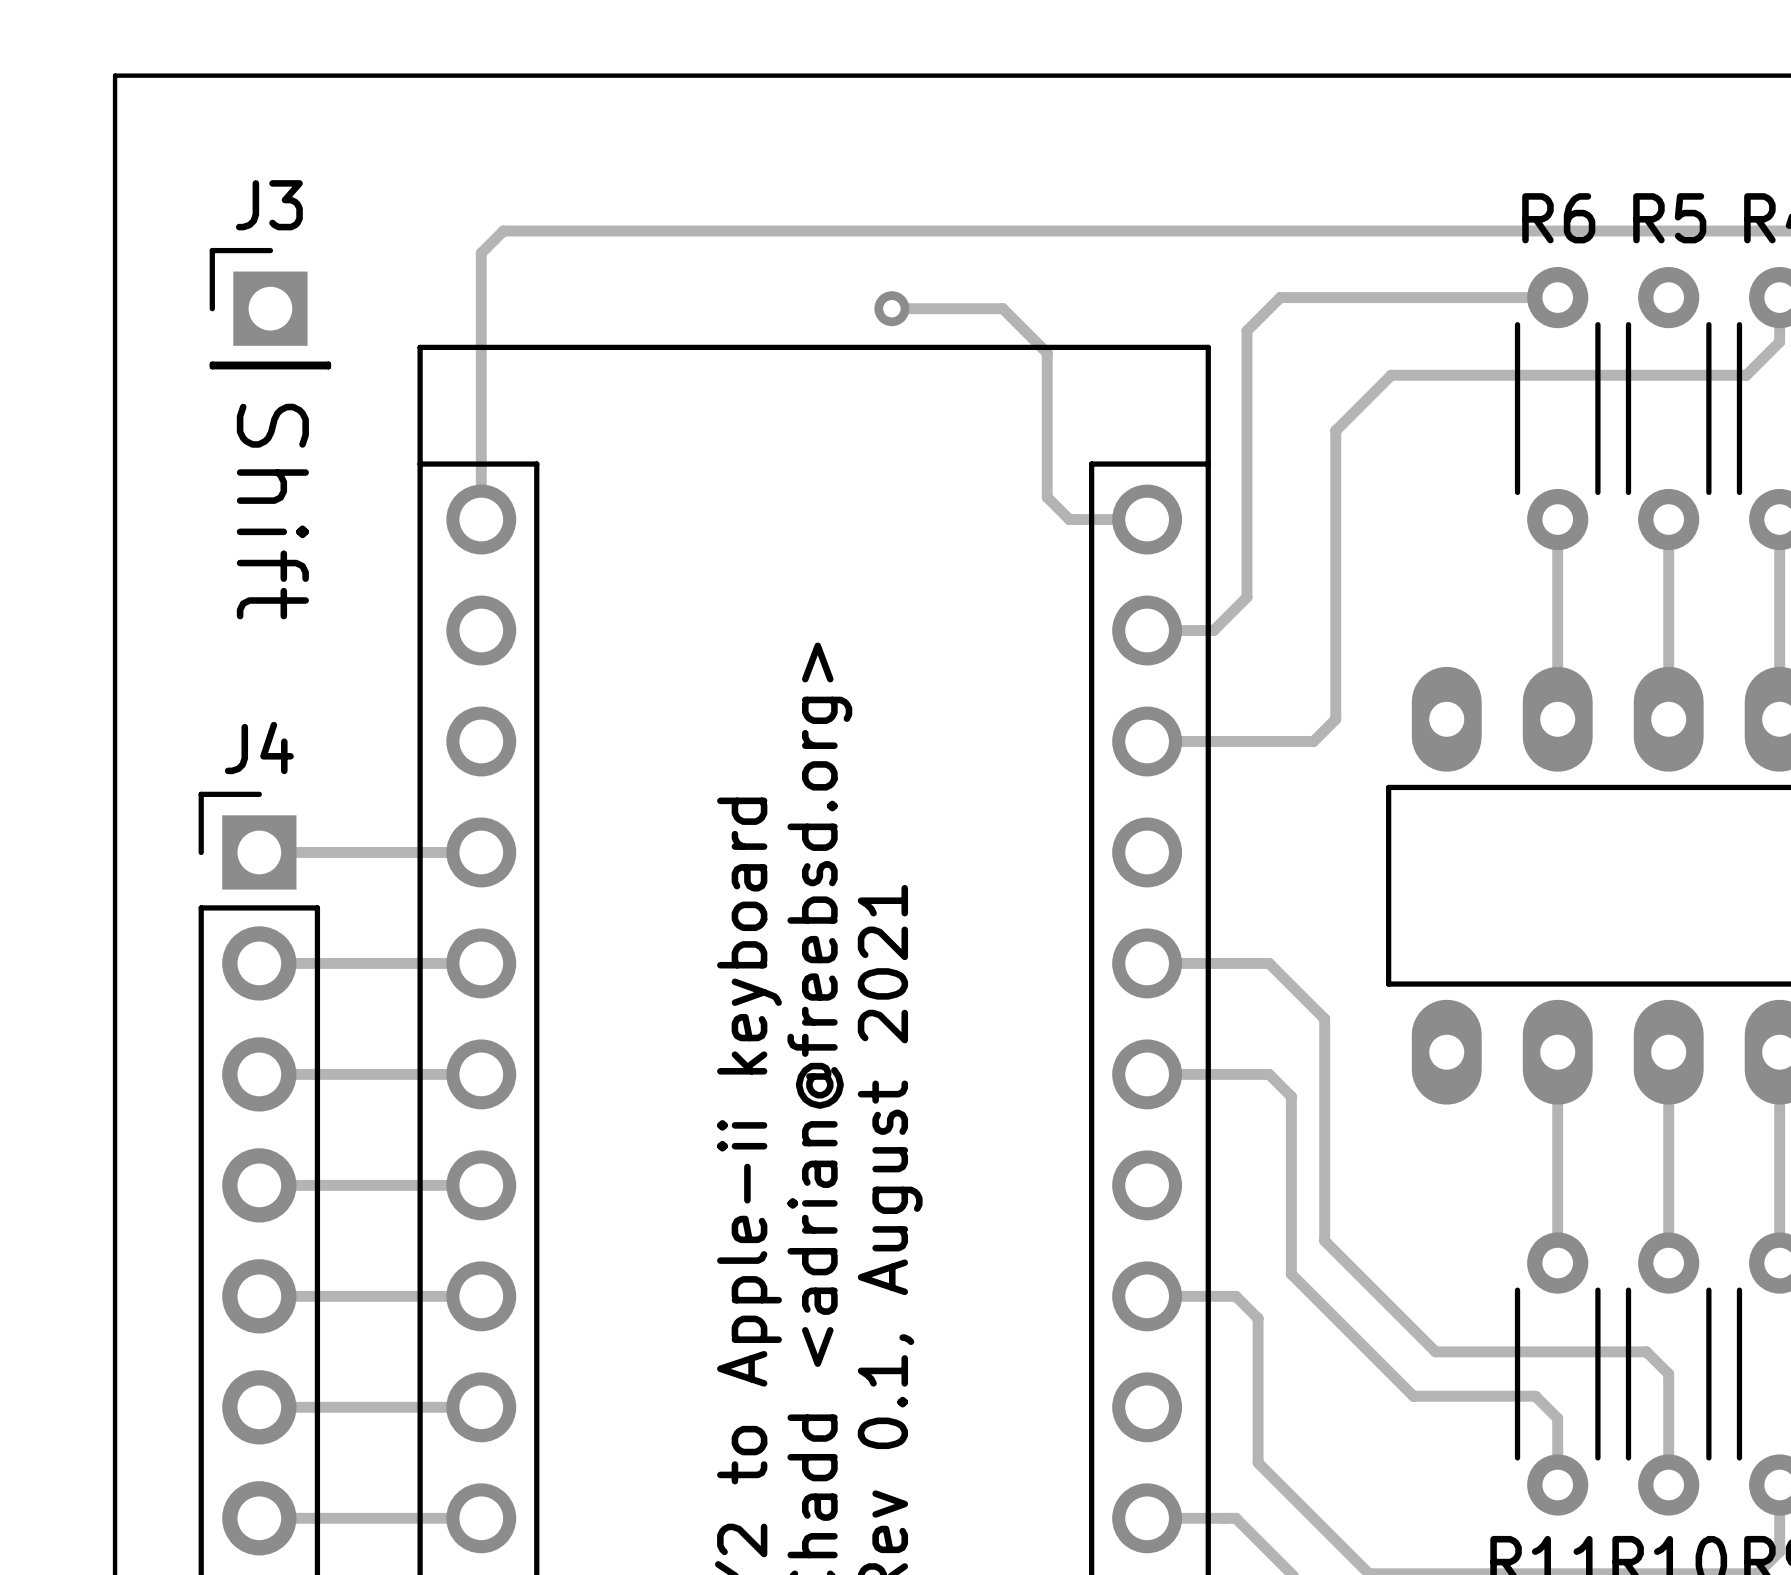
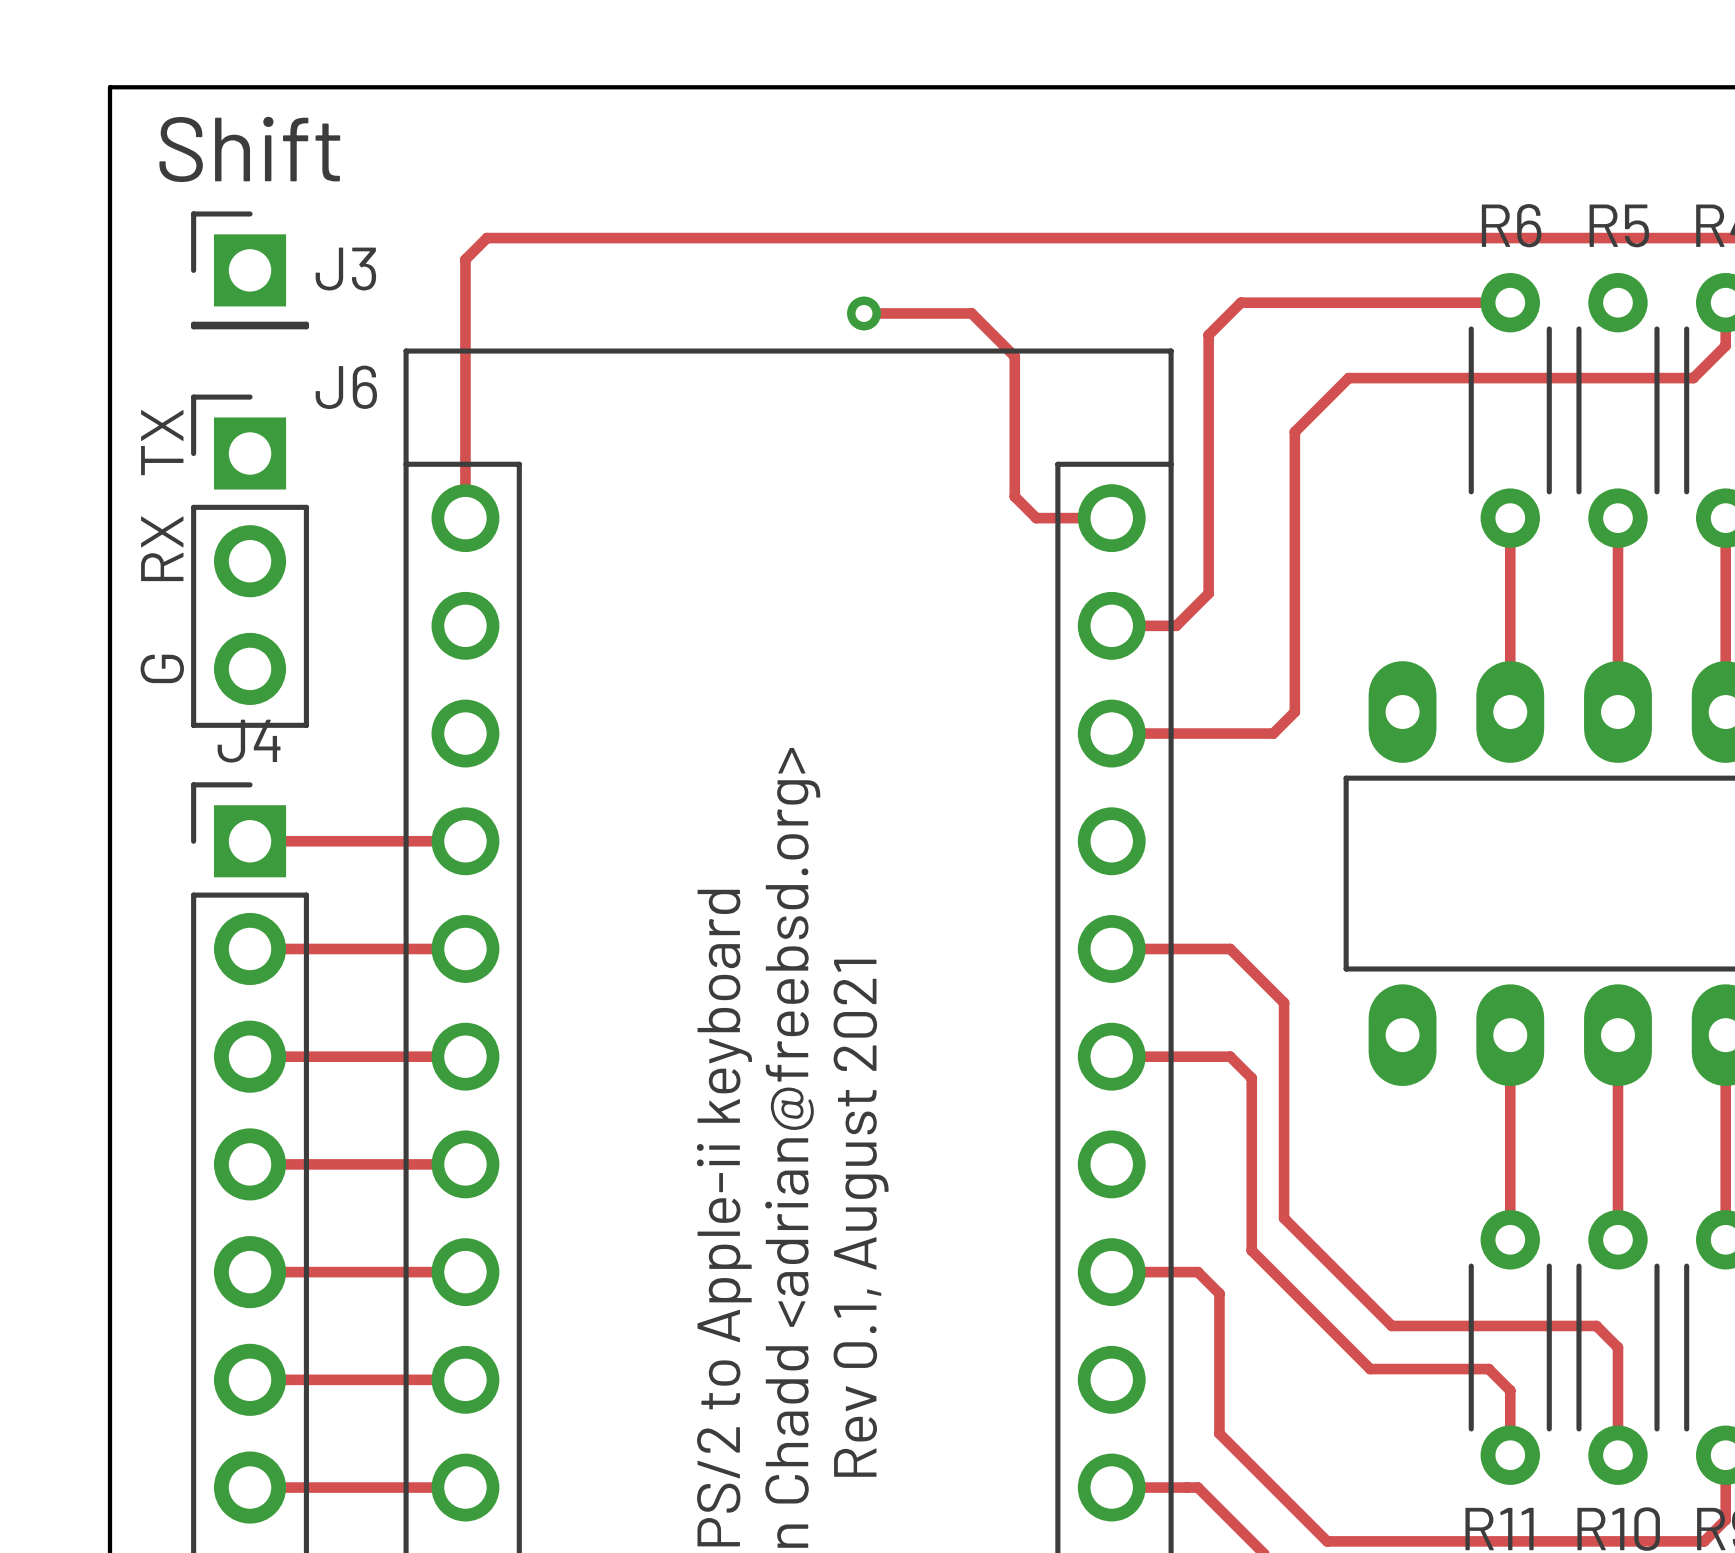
J3 name position: J3 (269, 205) -> J3 (345, 269)
J3 position: (270, 308) -> (250, 270)
text: none -> TX (162, 442)
text rotation: 0° (272, 511) -> 90° counterclockwise (249, 149)
text position: Shift (272, 511) -> Shift (249, 149)
text: none -> RX (162, 548)
J6: none -> (250, 561)
text: none -> G (162, 668)

